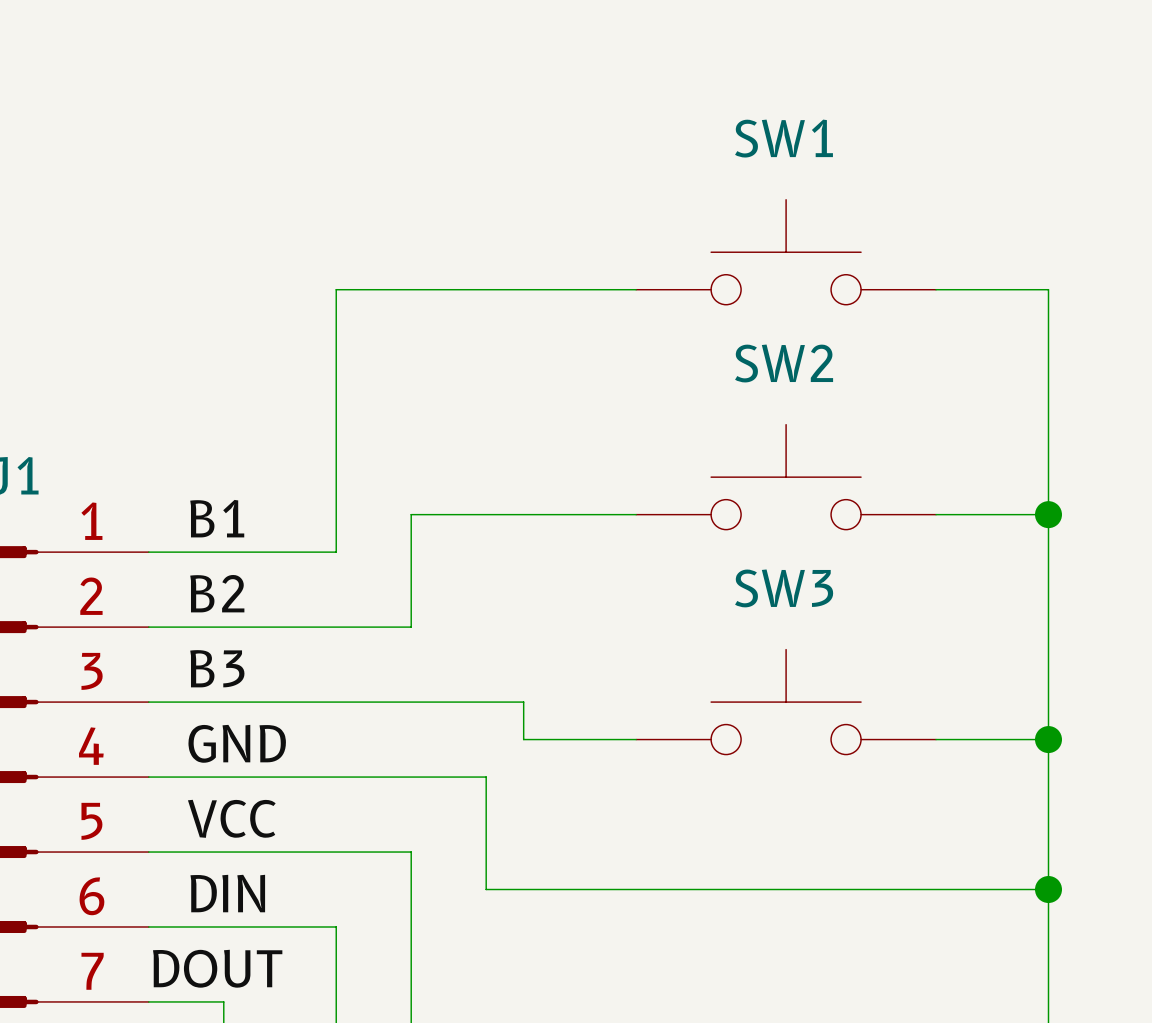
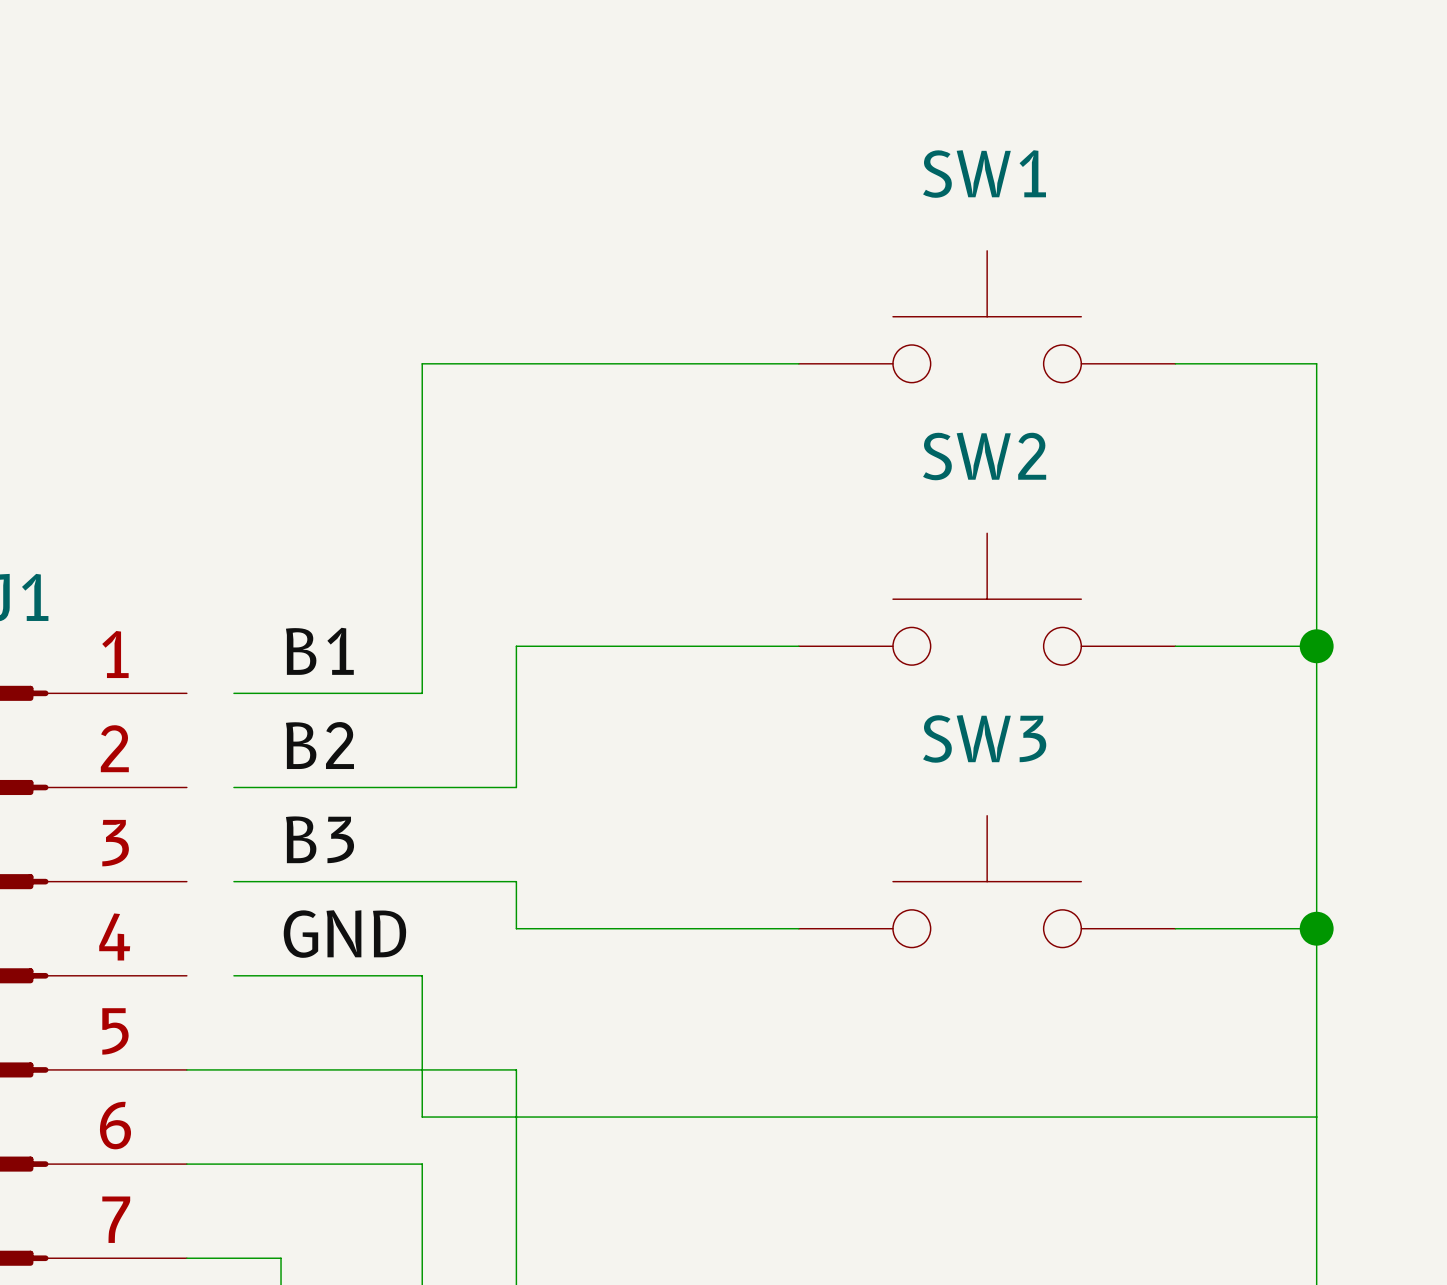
label position: B1 (217, 518) -> B1 (319, 651)
wire: (148, 552) (186, 552) -> none
label position: B2 (217, 593) -> B2 (319, 745)
wire: (148, 627) (186, 627) -> none
label position: B3 (217, 668) -> B3 (320, 839)
wire: (148, 702) (186, 702) -> none
wire: (411, 702) (523, 702) (523, 739) -> (516, 881) (516, 928) (657, 928)
label position: GND (237, 743) -> GND (344, 934)
wire: (148, 777) (186, 777) -> none
wire: (336, 777) (486, 777) (486, 889) -> (422, 975) (422, 1117) (610, 1117)
label: VCC (231, 818) -> none
junction: (1048, 889) -> none
label: DIN (227, 893) -> none
label: DOUT (217, 968) -> none

